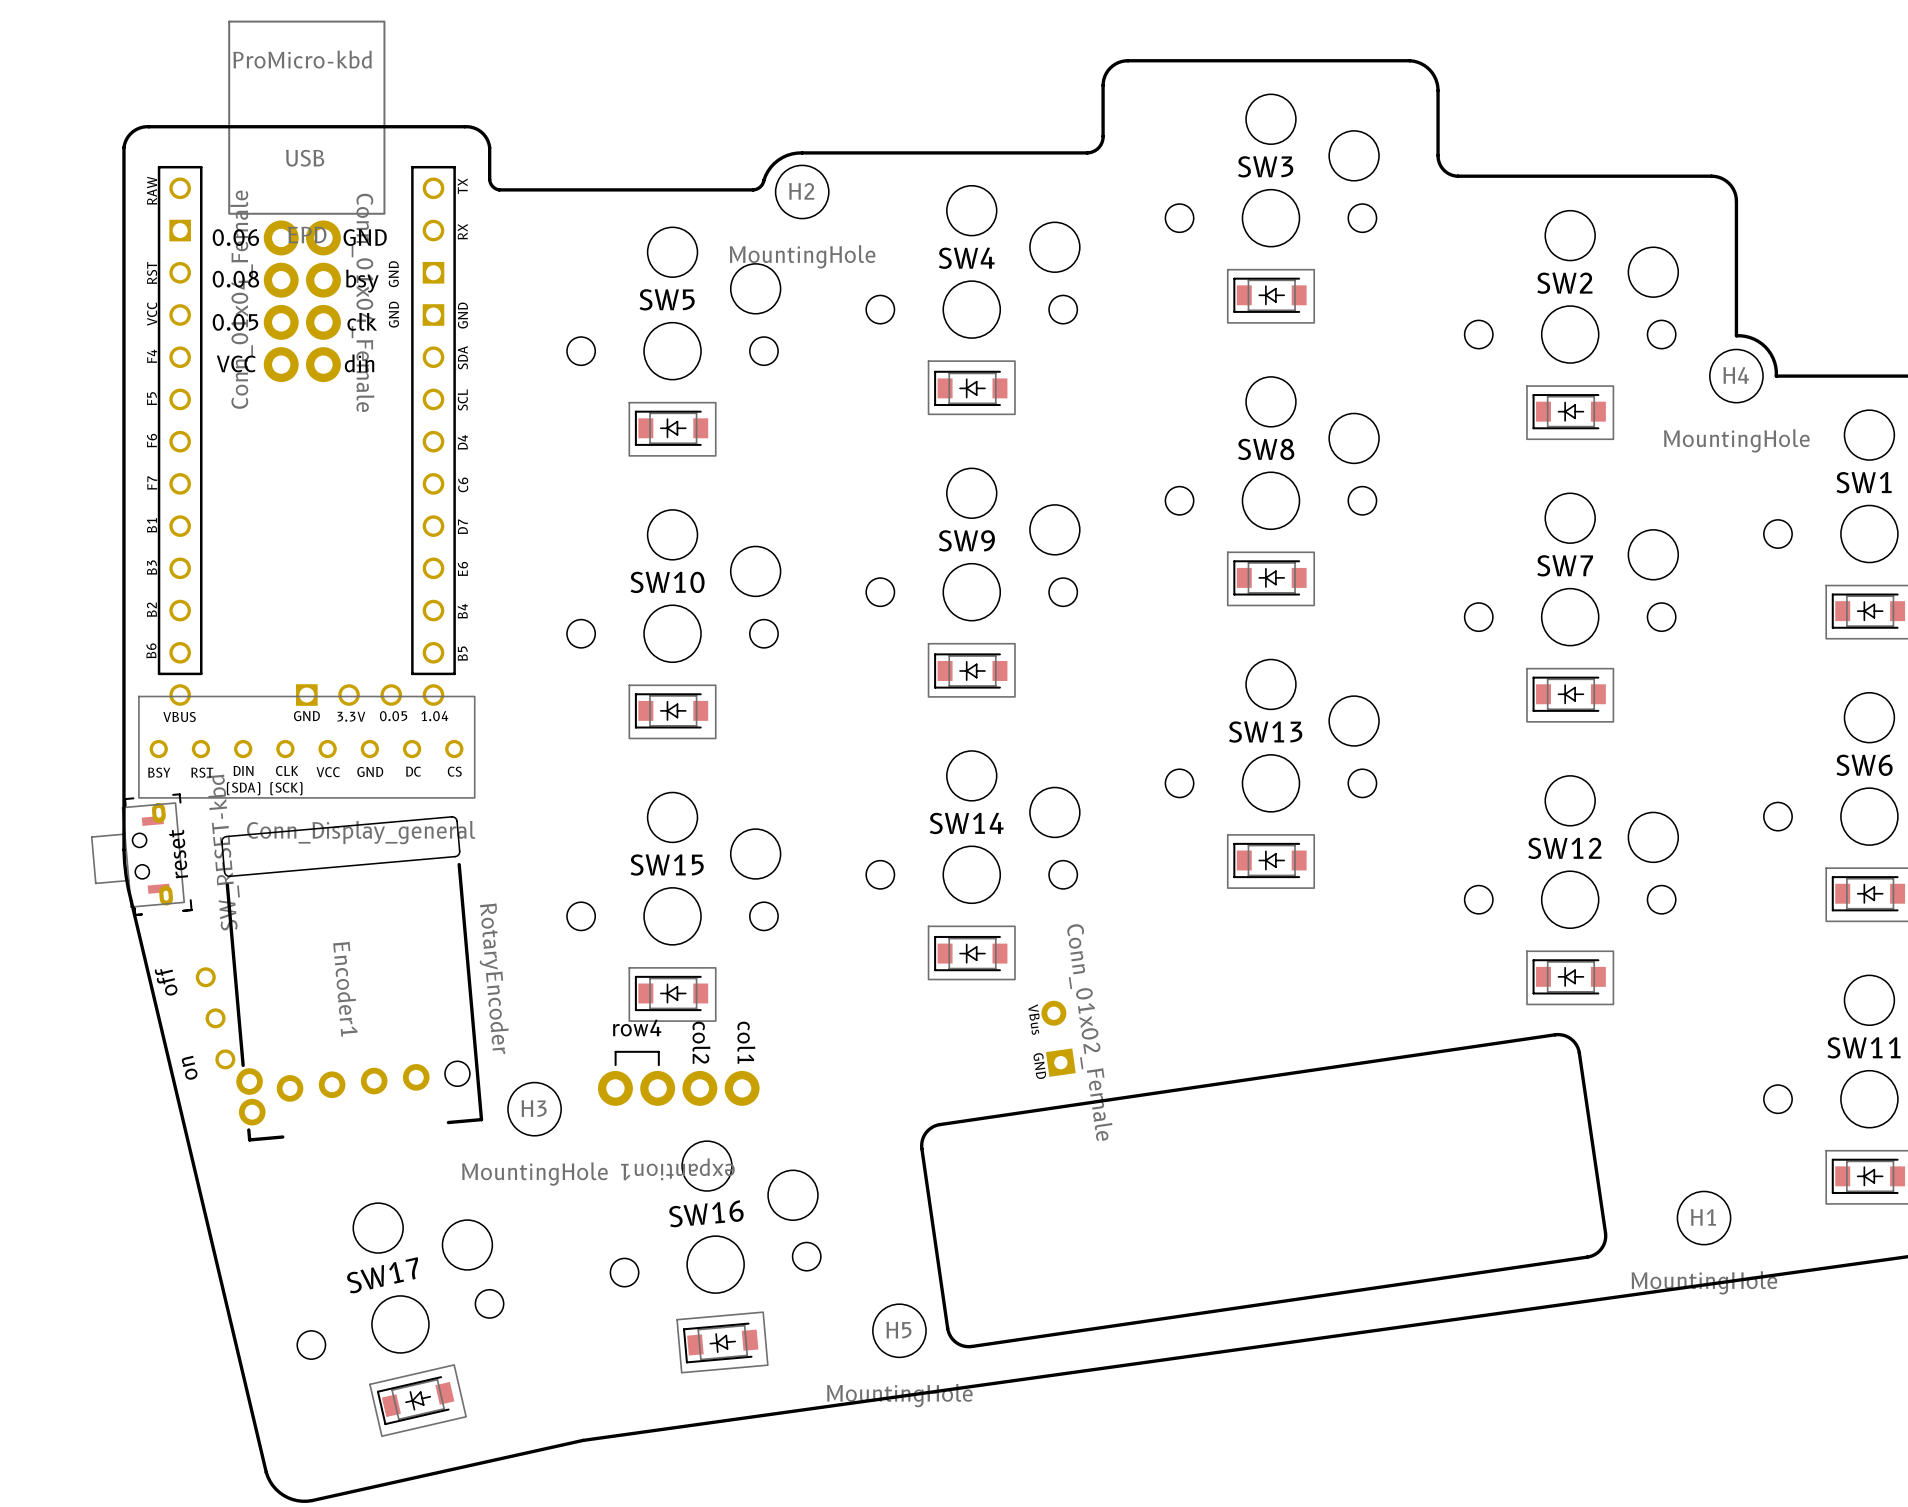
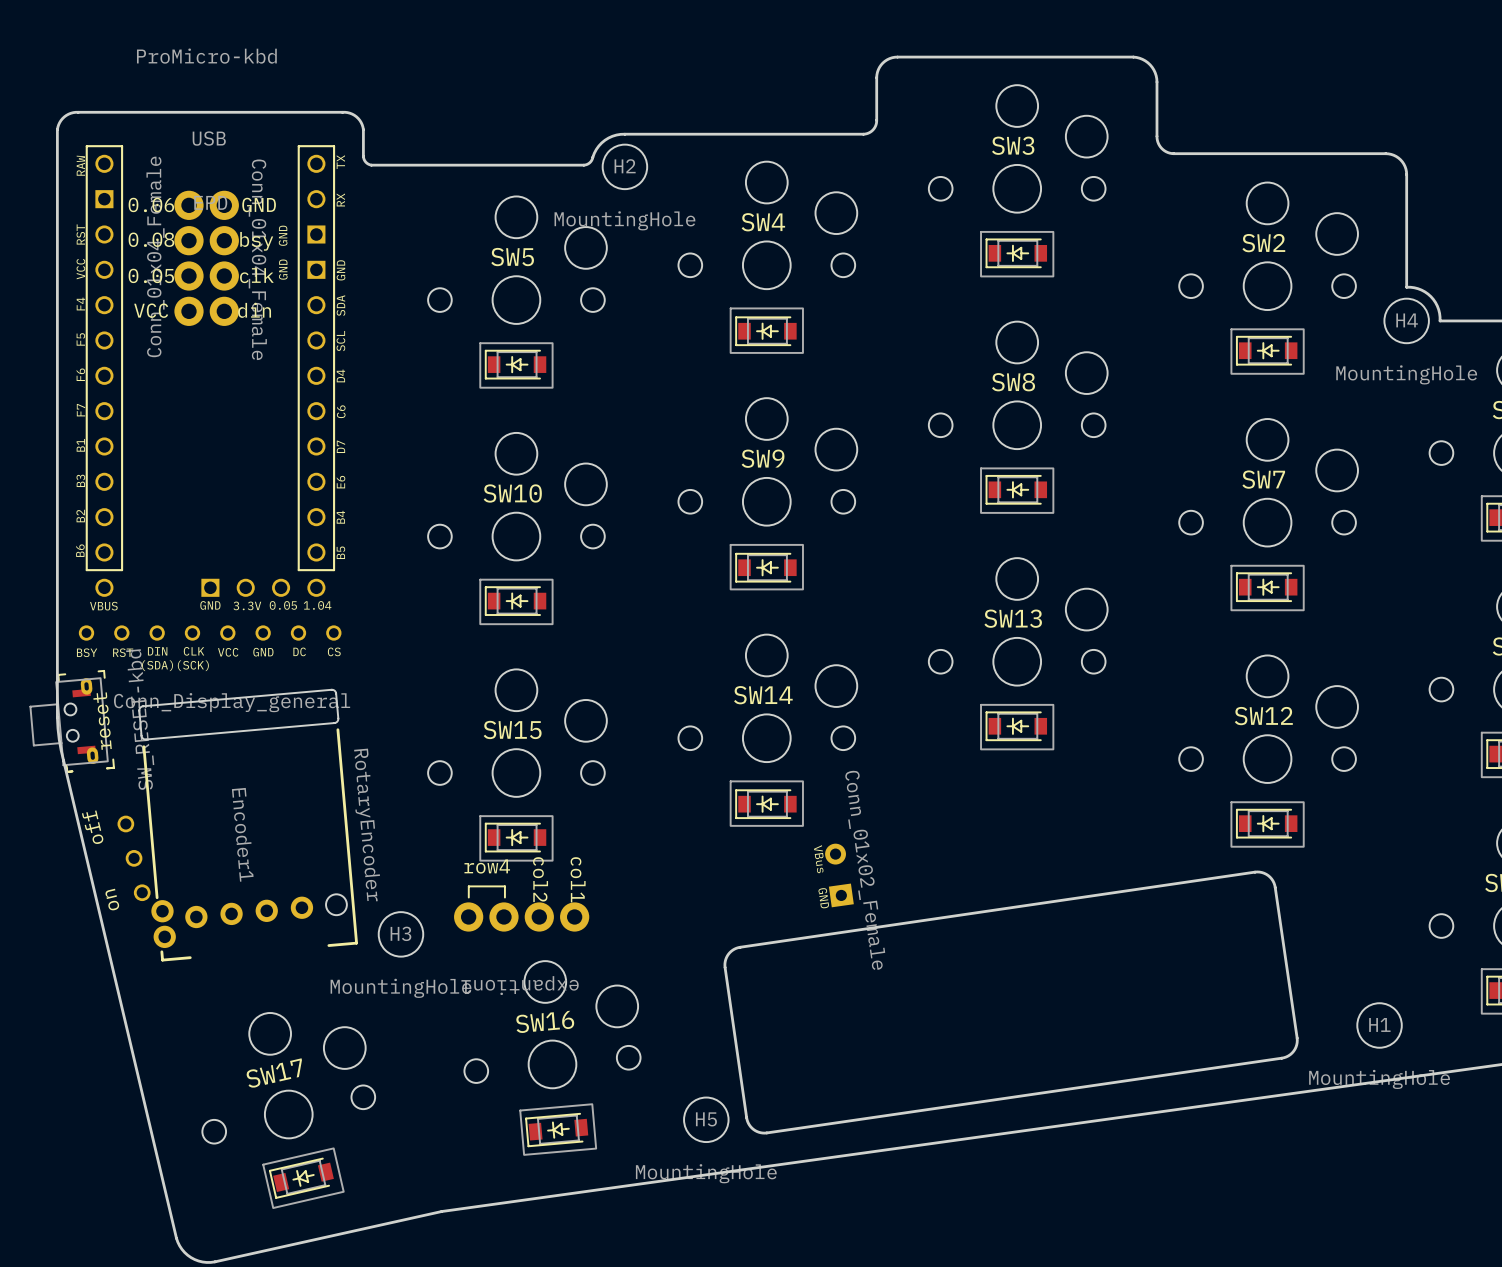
part: ProMicro-kbd (306, 363) -> none
part: none -> ProMicro-kbd (210, 370)
part footprint: [138, 695, 476, 799] -> [78, 625, 342, 641]

